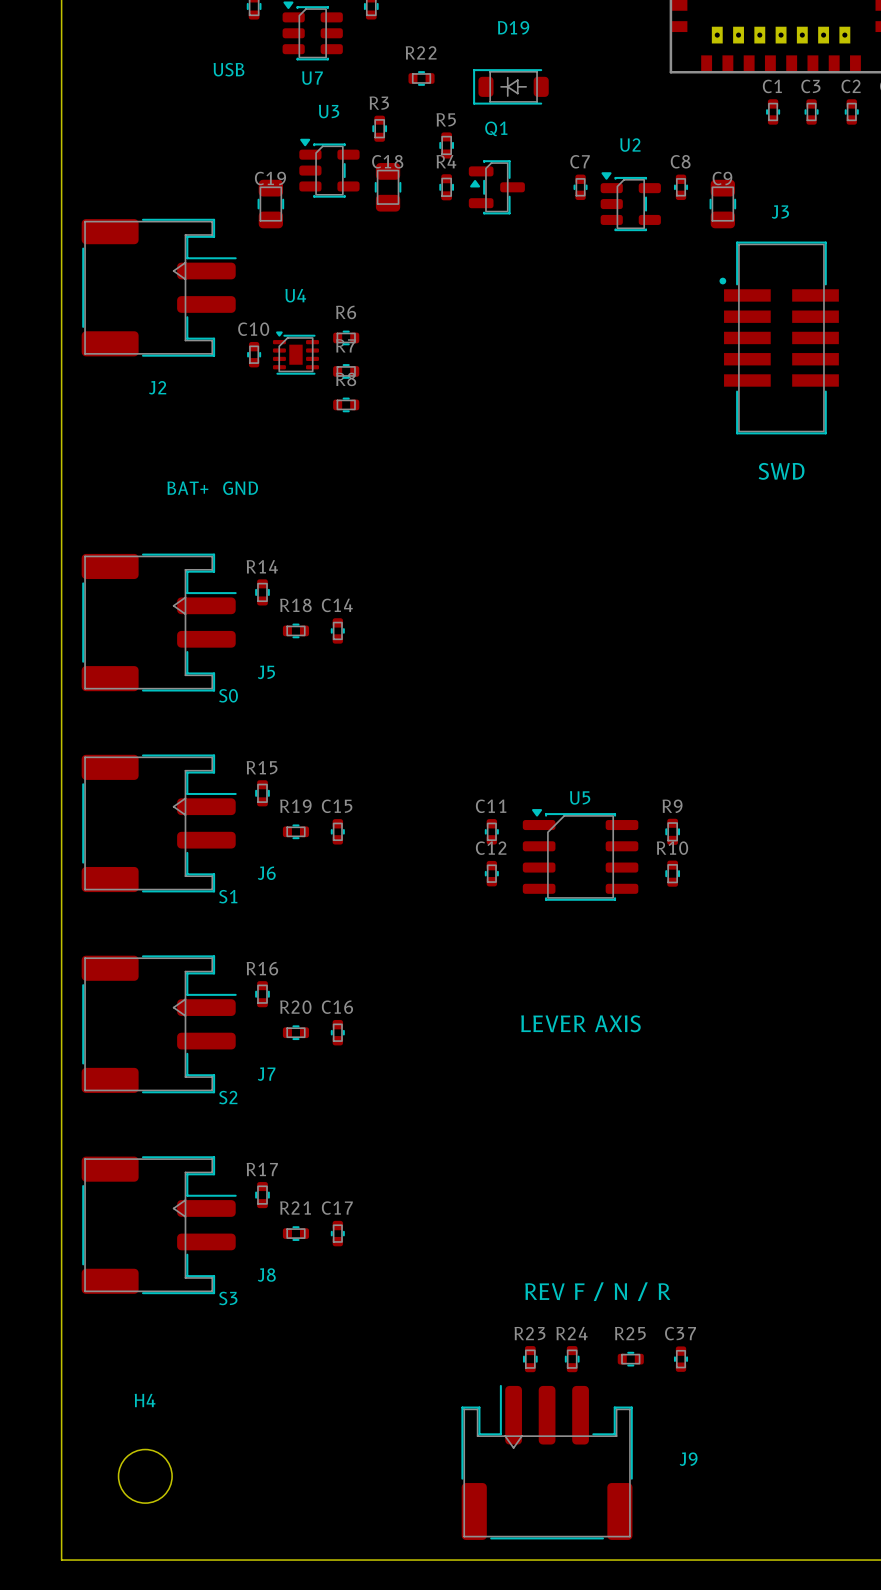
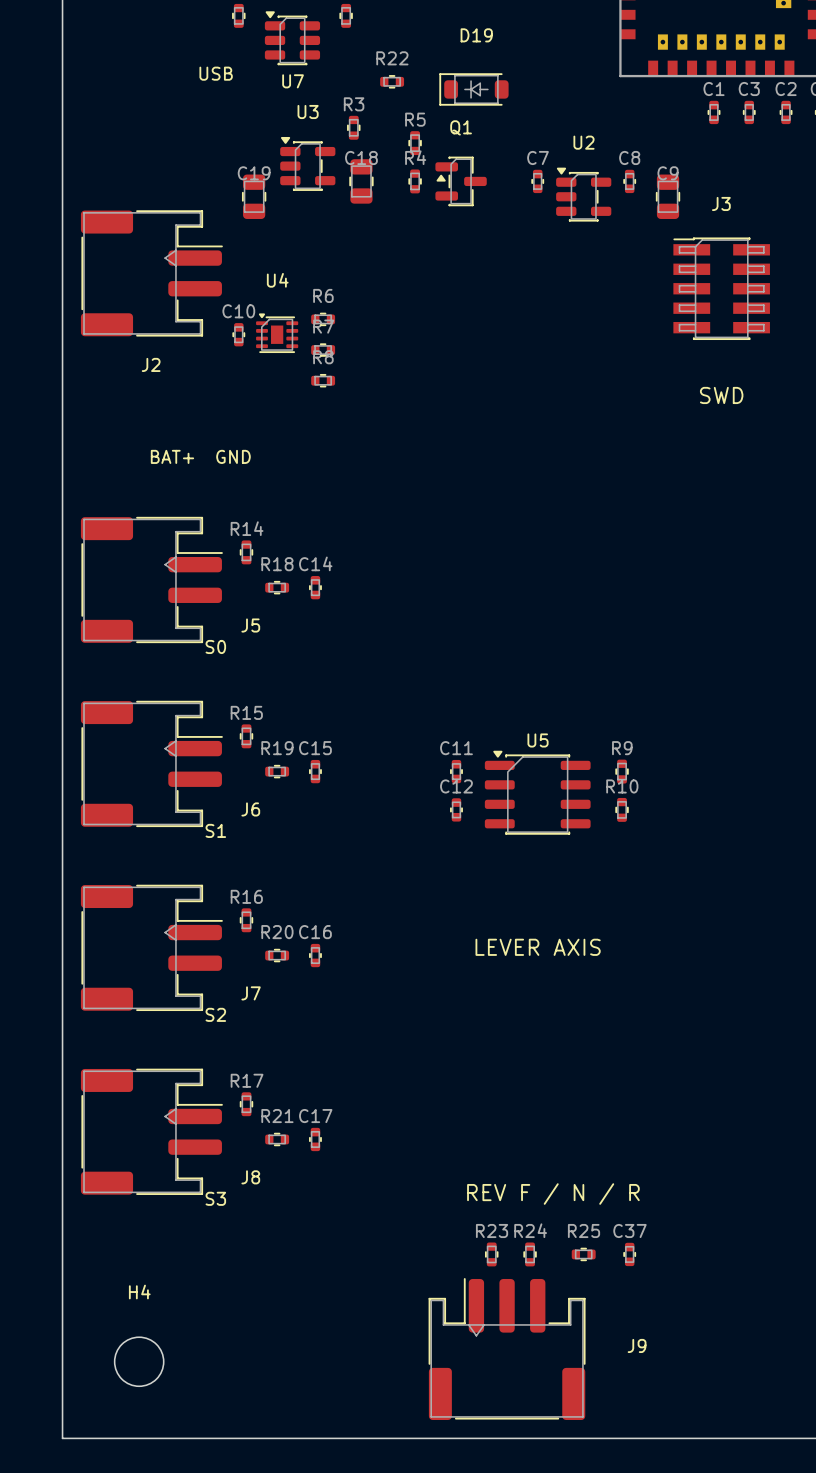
J3 footprint: [719, 241, 839, 435] -> [673, 237, 770, 341]
text position: SWD (781, 471) -> SWD (721, 395)

